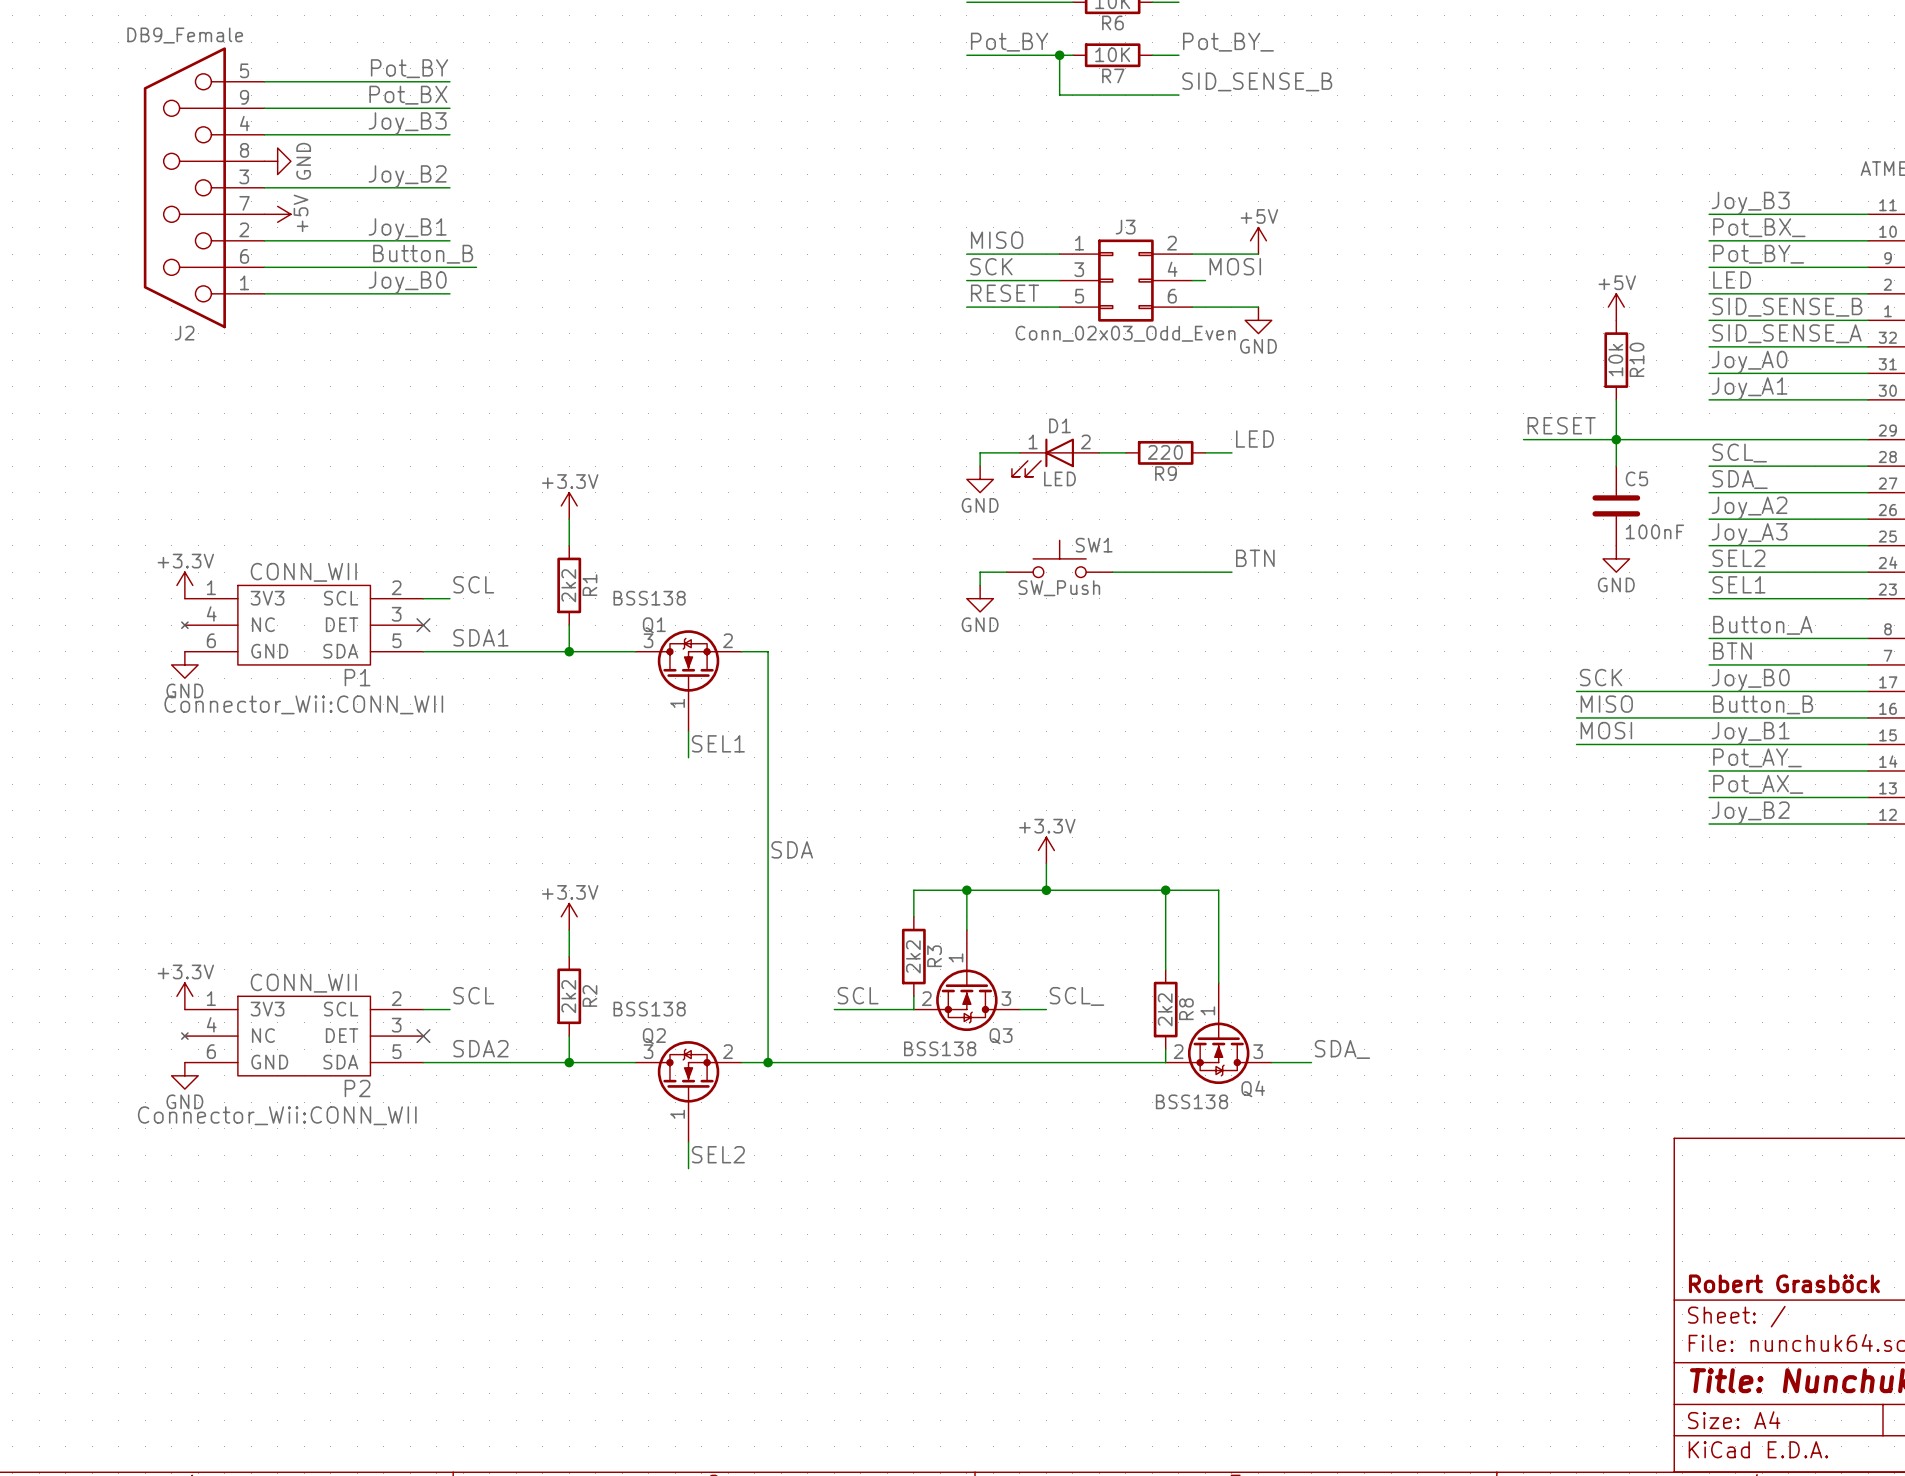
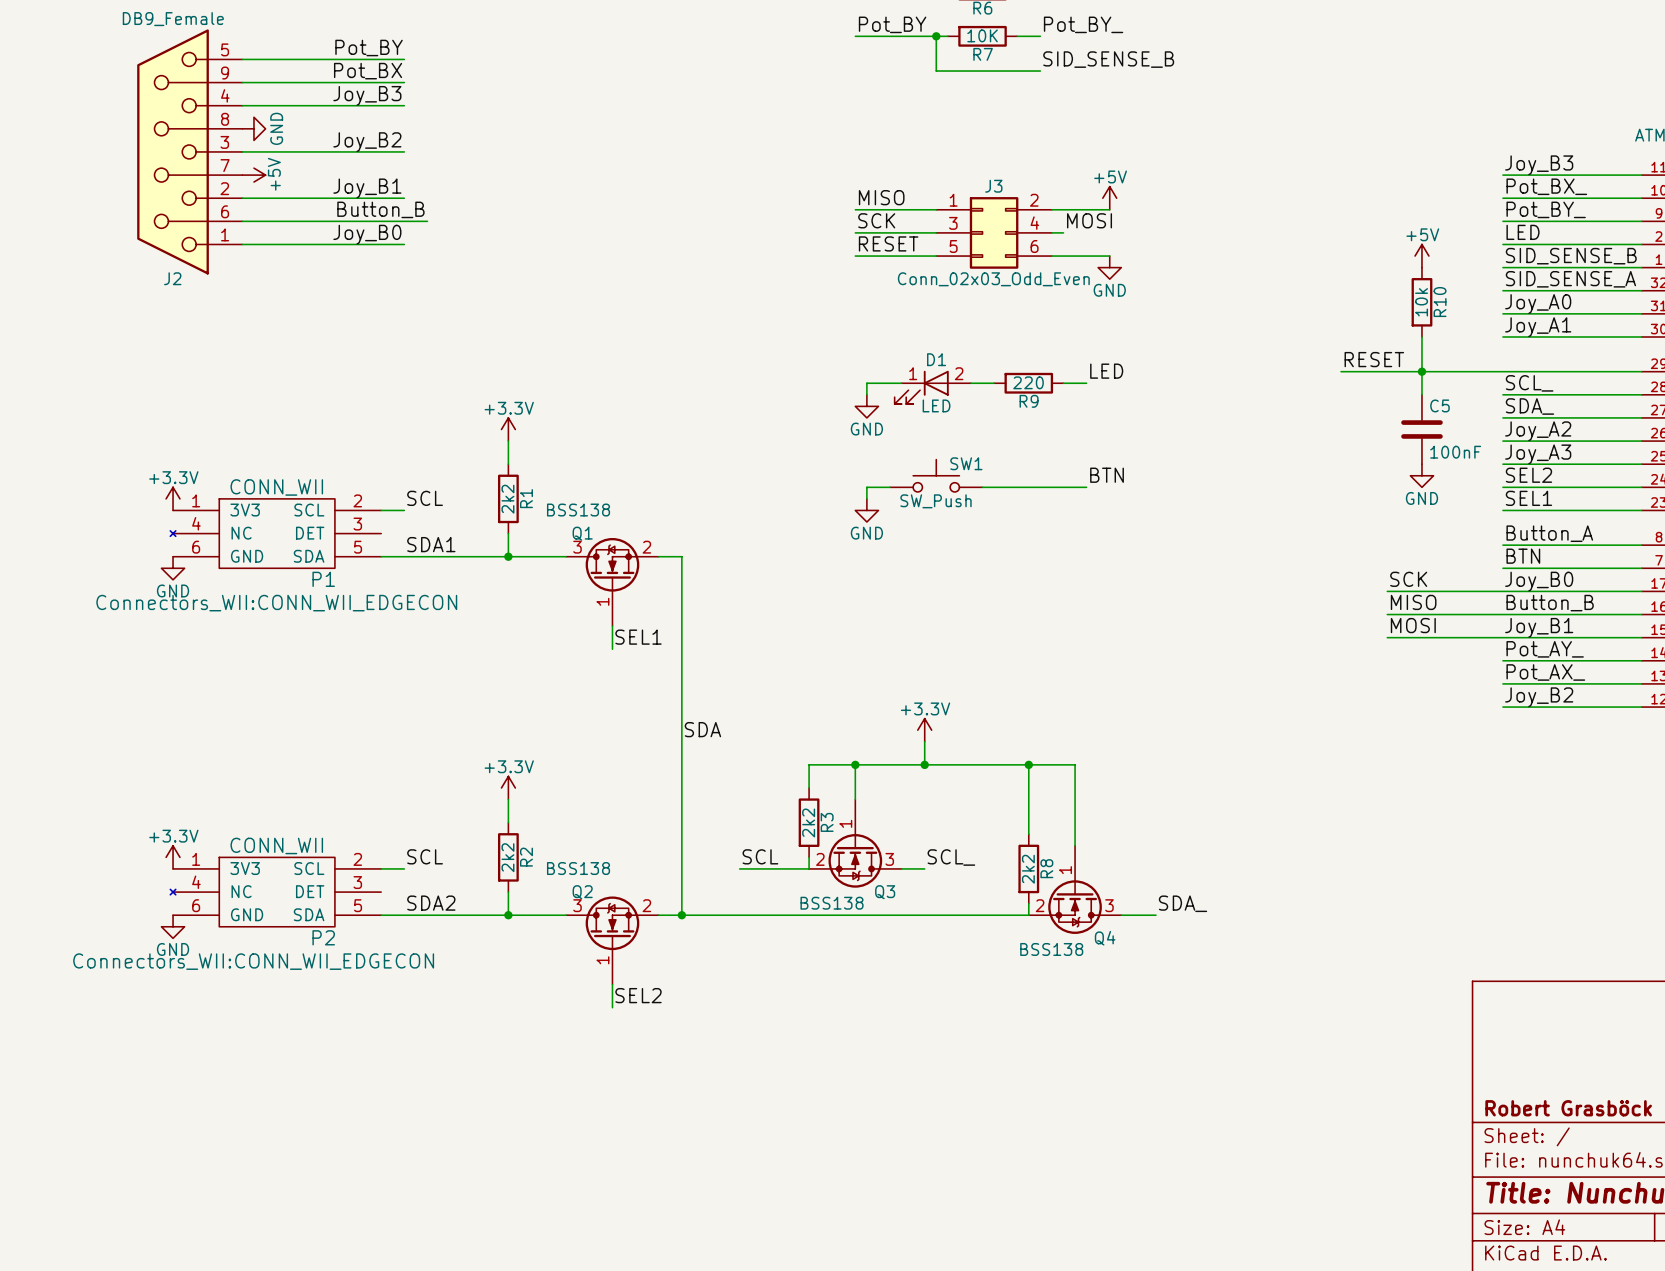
no-connect mark: (423, 625) -> none
P1 text: Connector_Wii:CONN_WII (303, 704) -> Connectors_WII:CONN_WII_EDGECON (276, 603)
no-connect mark: (423, 1036) -> none
P2 text: Connector_Wii:CONN_WII (277, 1115) -> Connectors_WII:CONN_WII_EDGECON (253, 961)

